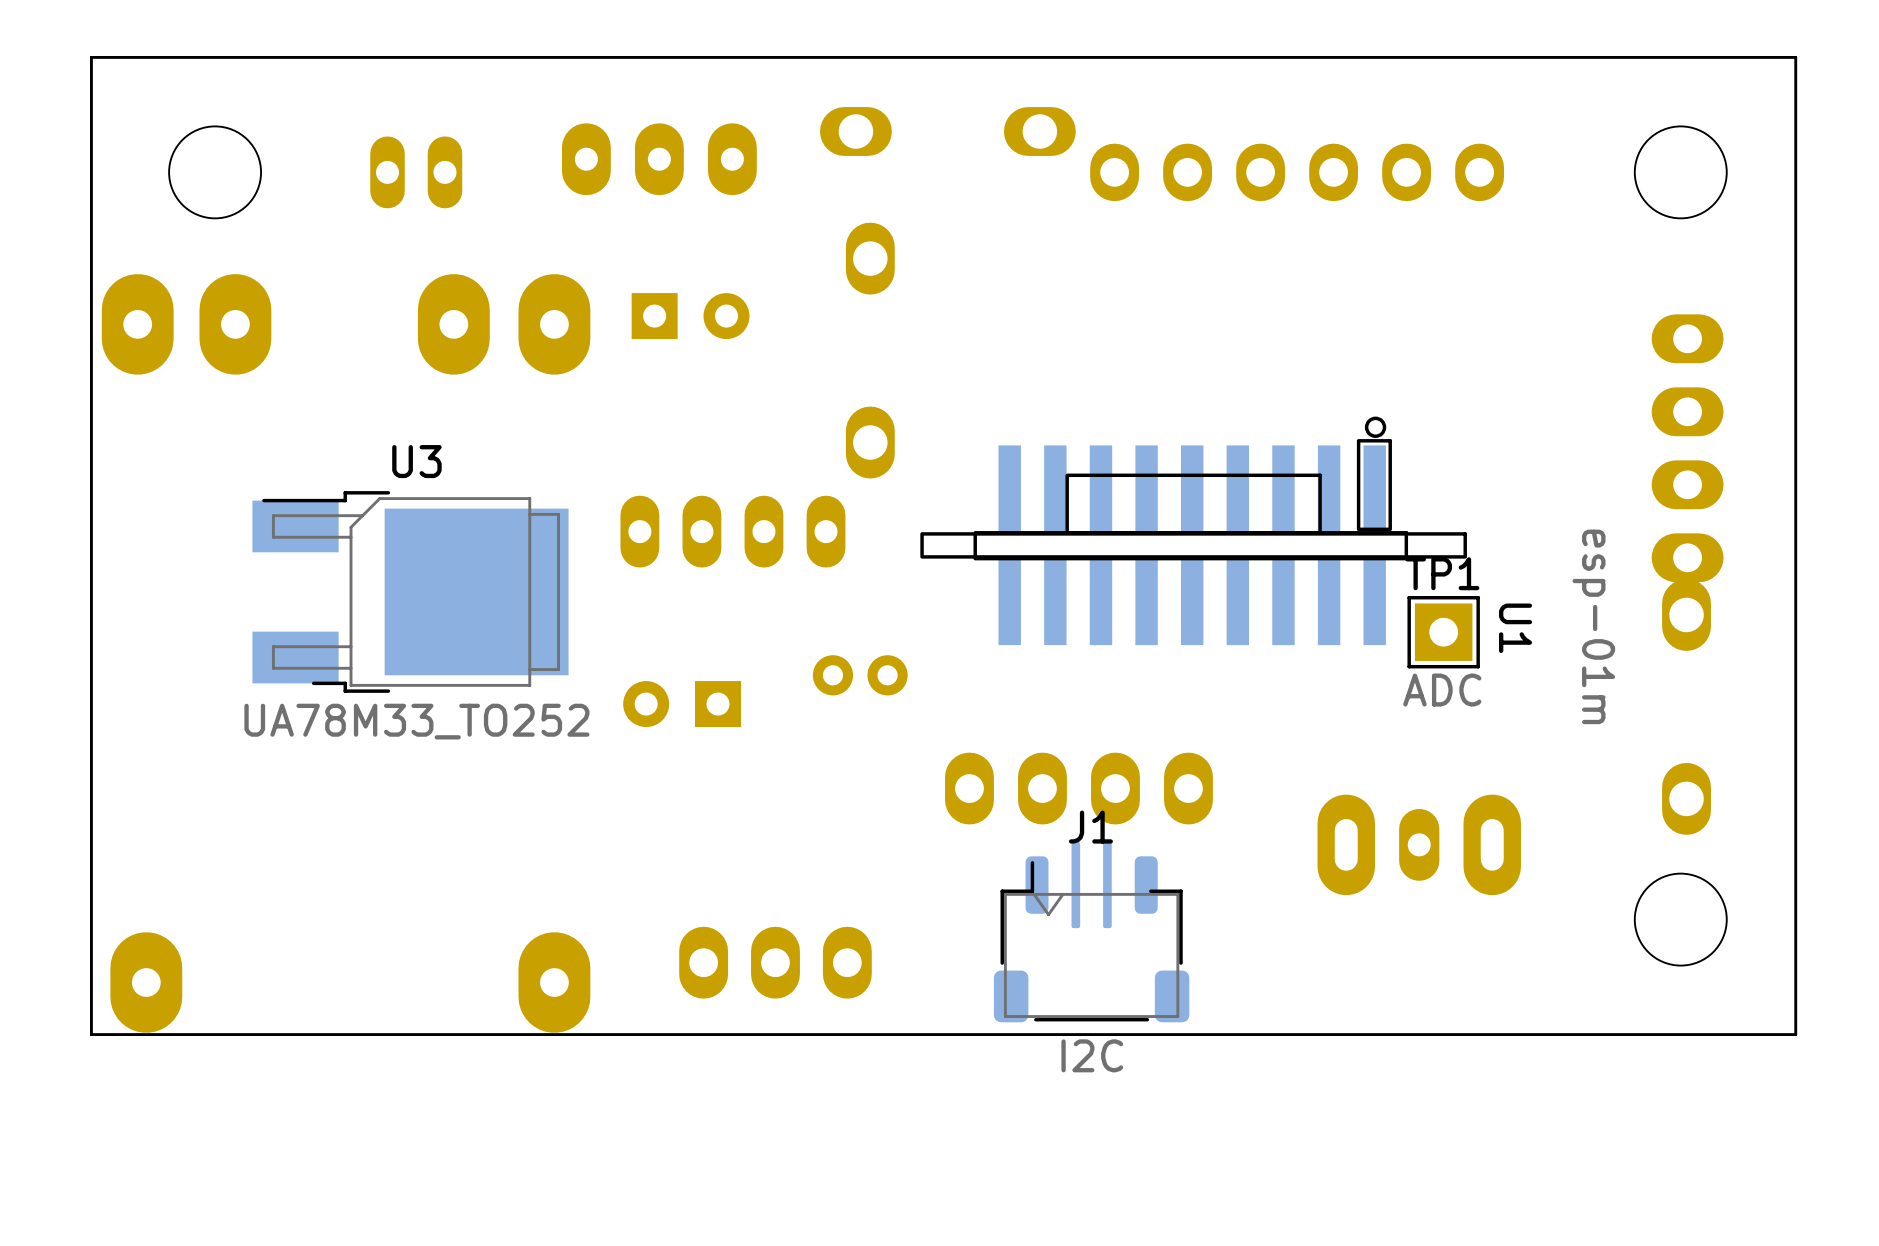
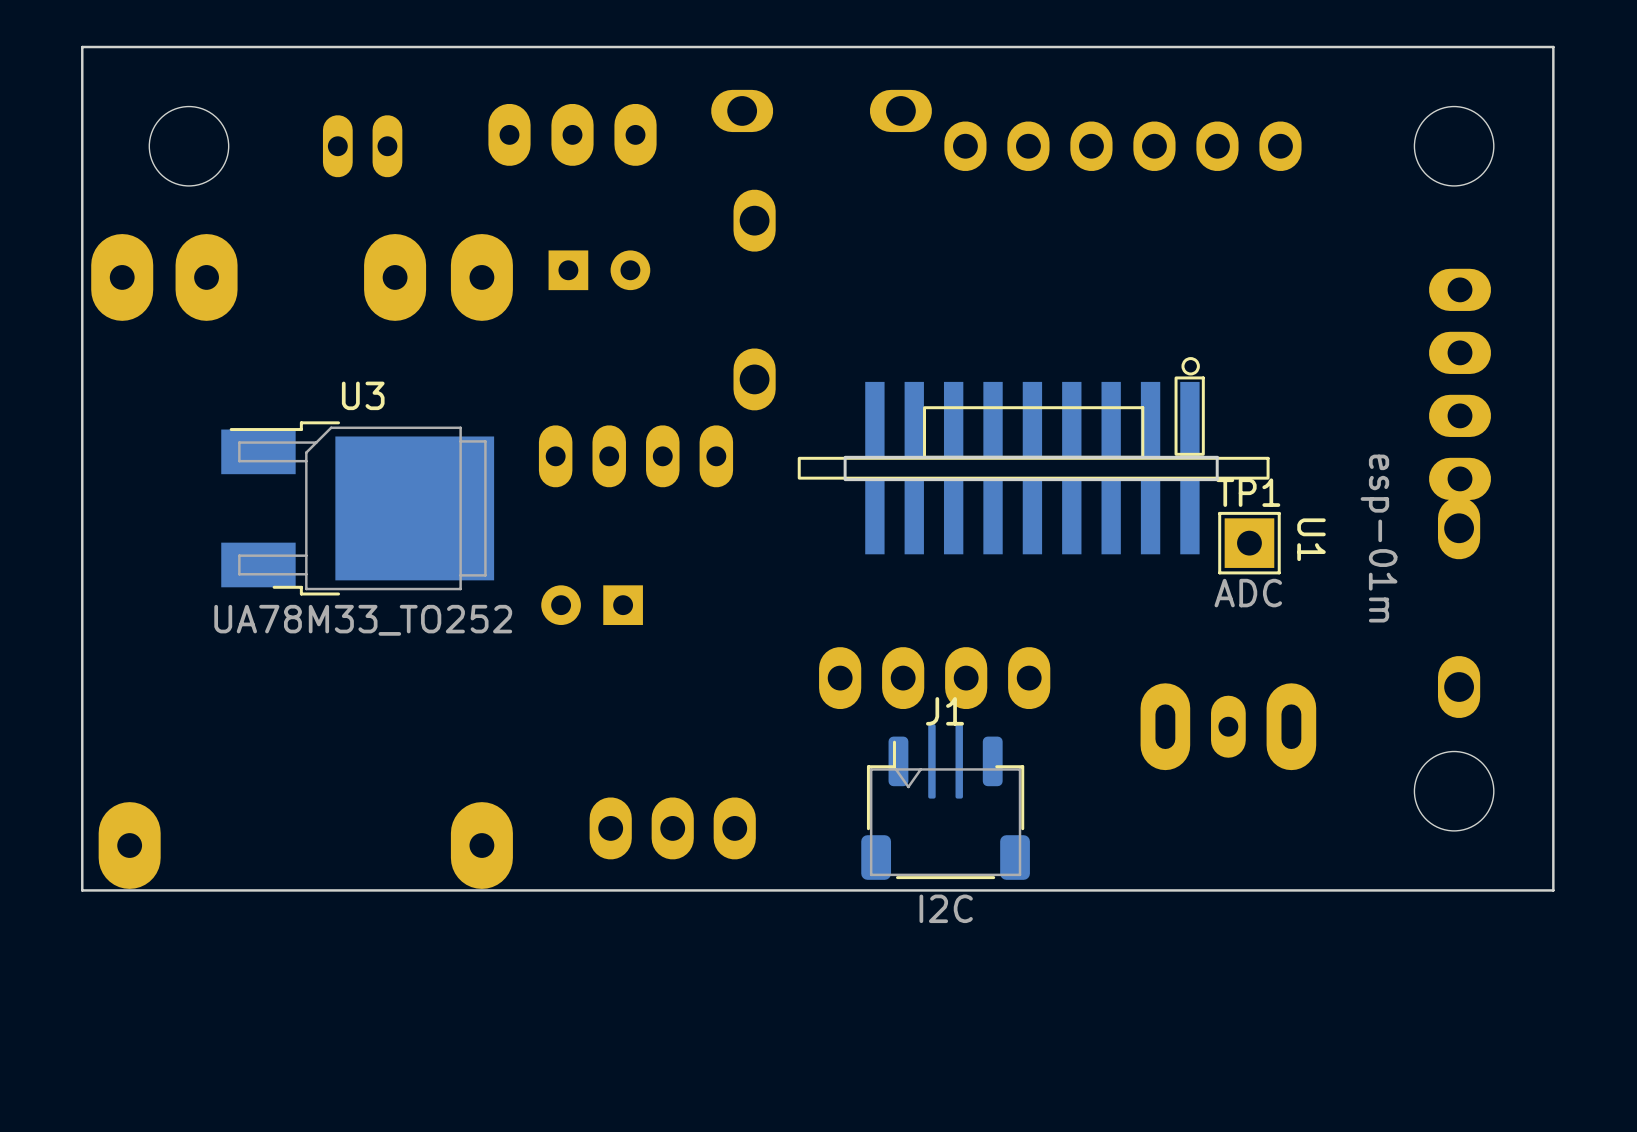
part: (860, 675) -> none

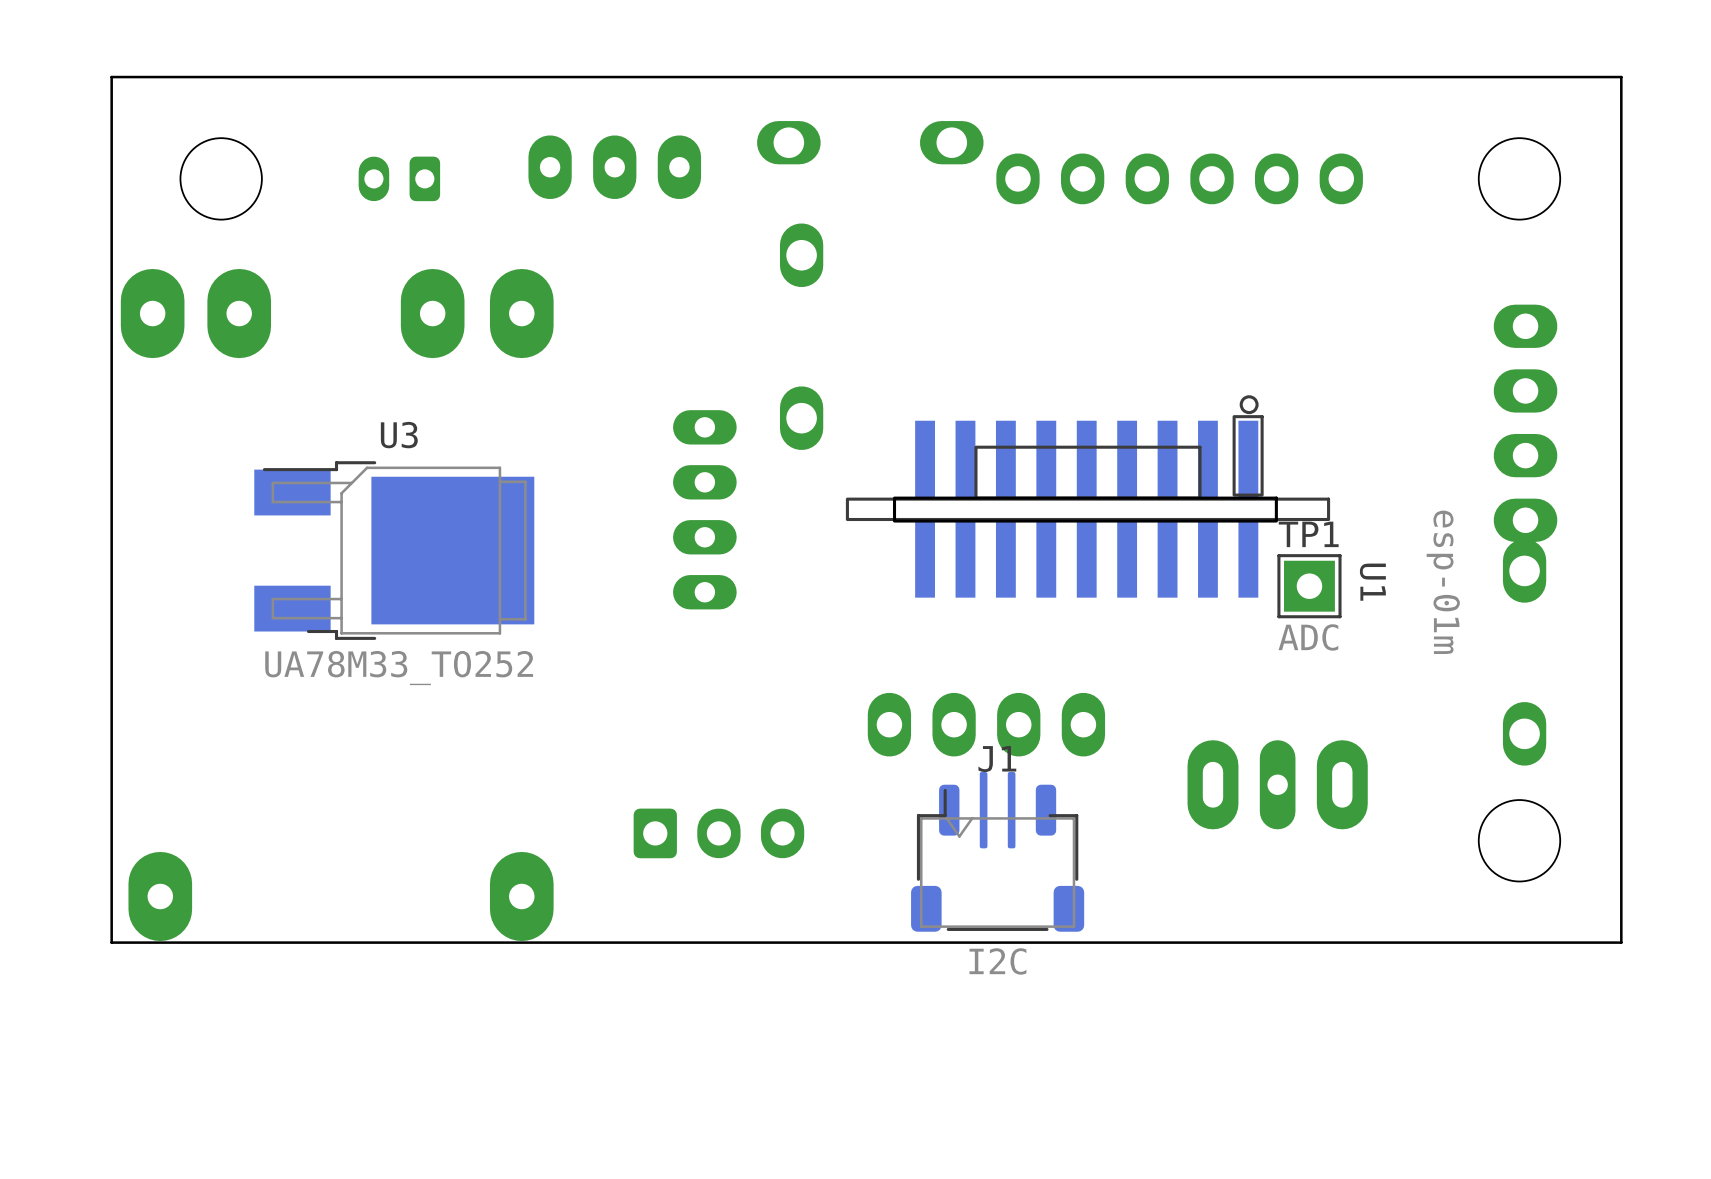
part footprint: [322, 115, 403, 178] -> [358, 156, 441, 202]
part: (599, 270) -> none
part rotation: 0° (635, 456) -> 90° clockwise (704, 509)
part: (592, 605) -> none
part footprint: [1140, 683, 1317, 771] -> [1187, 740, 1368, 830]
part: none -> (718, 833)
part: (672, 828) -> none

